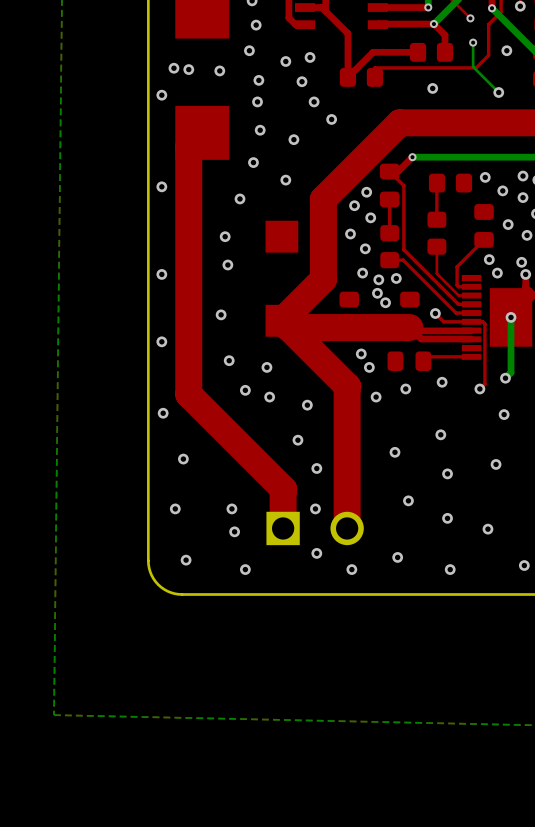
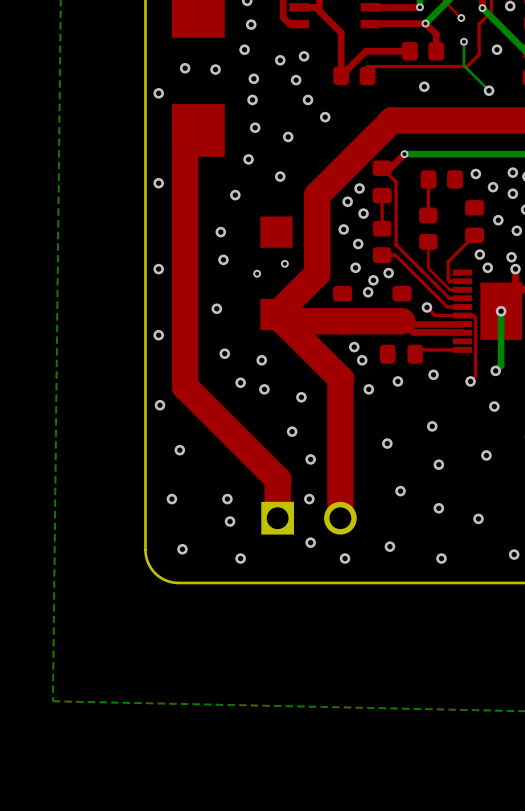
via: (173, 68) -> none
via: none -> (284, 263)
via: none -> (257, 273)
via: (378, 279) -> none
via: none -> (373, 280)
via: (377, 293) -> none
via: none -> (368, 292)
via: (385, 302) -> none

